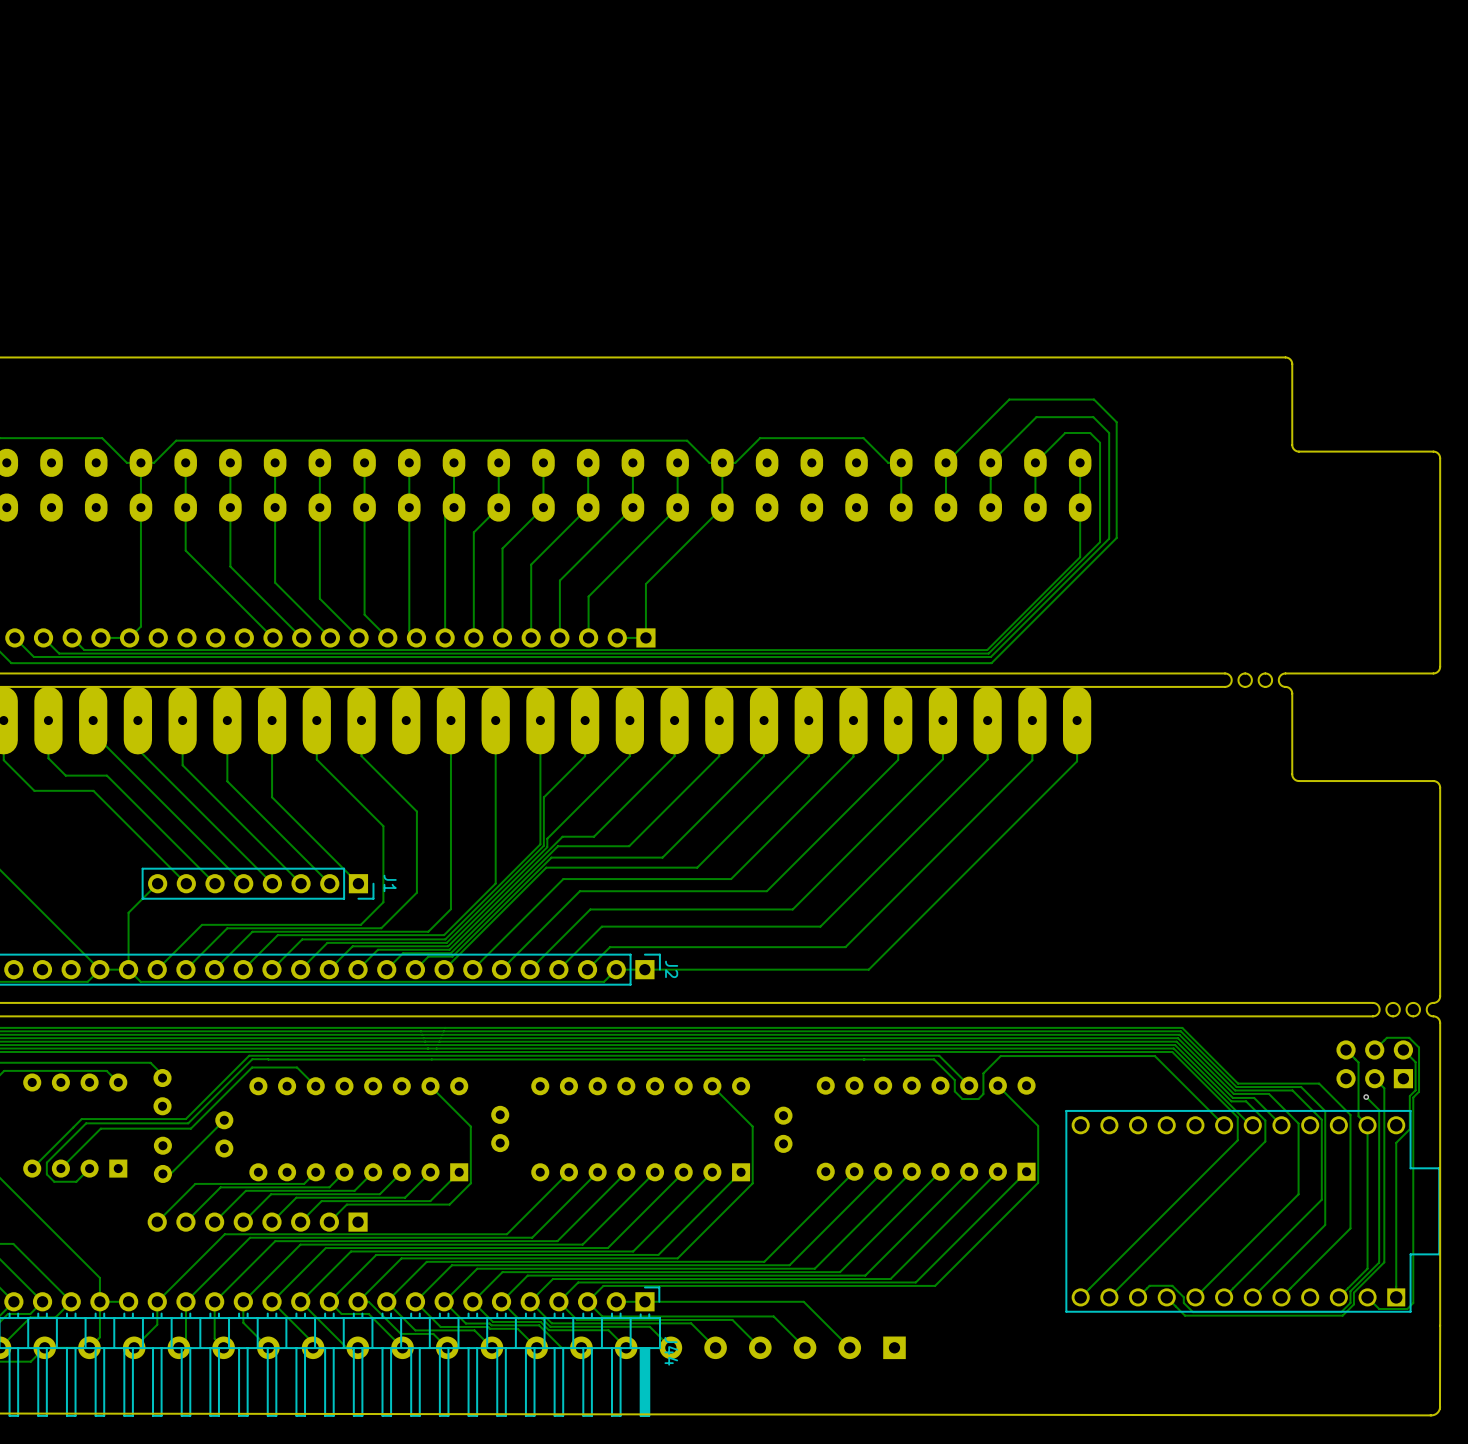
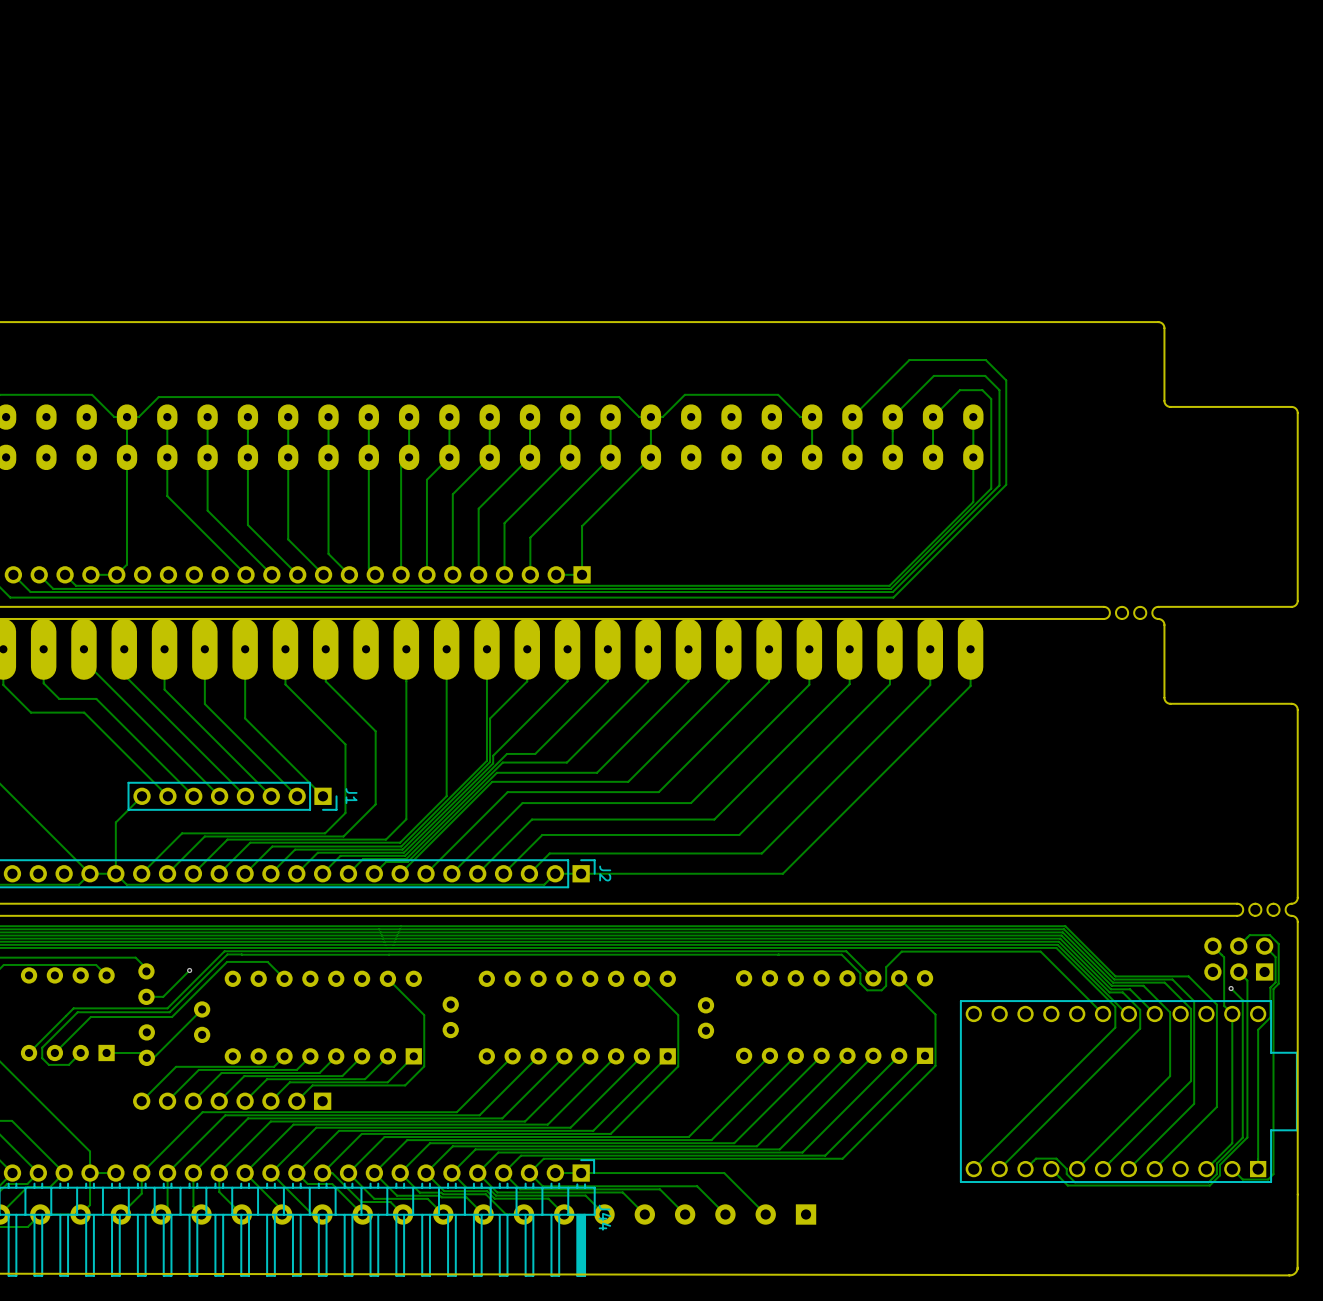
track: none -> (189, 970) (163, 996) (146, 996)
via: none -> (189, 970)
track: none -> (106, 1052) (141, 1052) (146, 1057)

